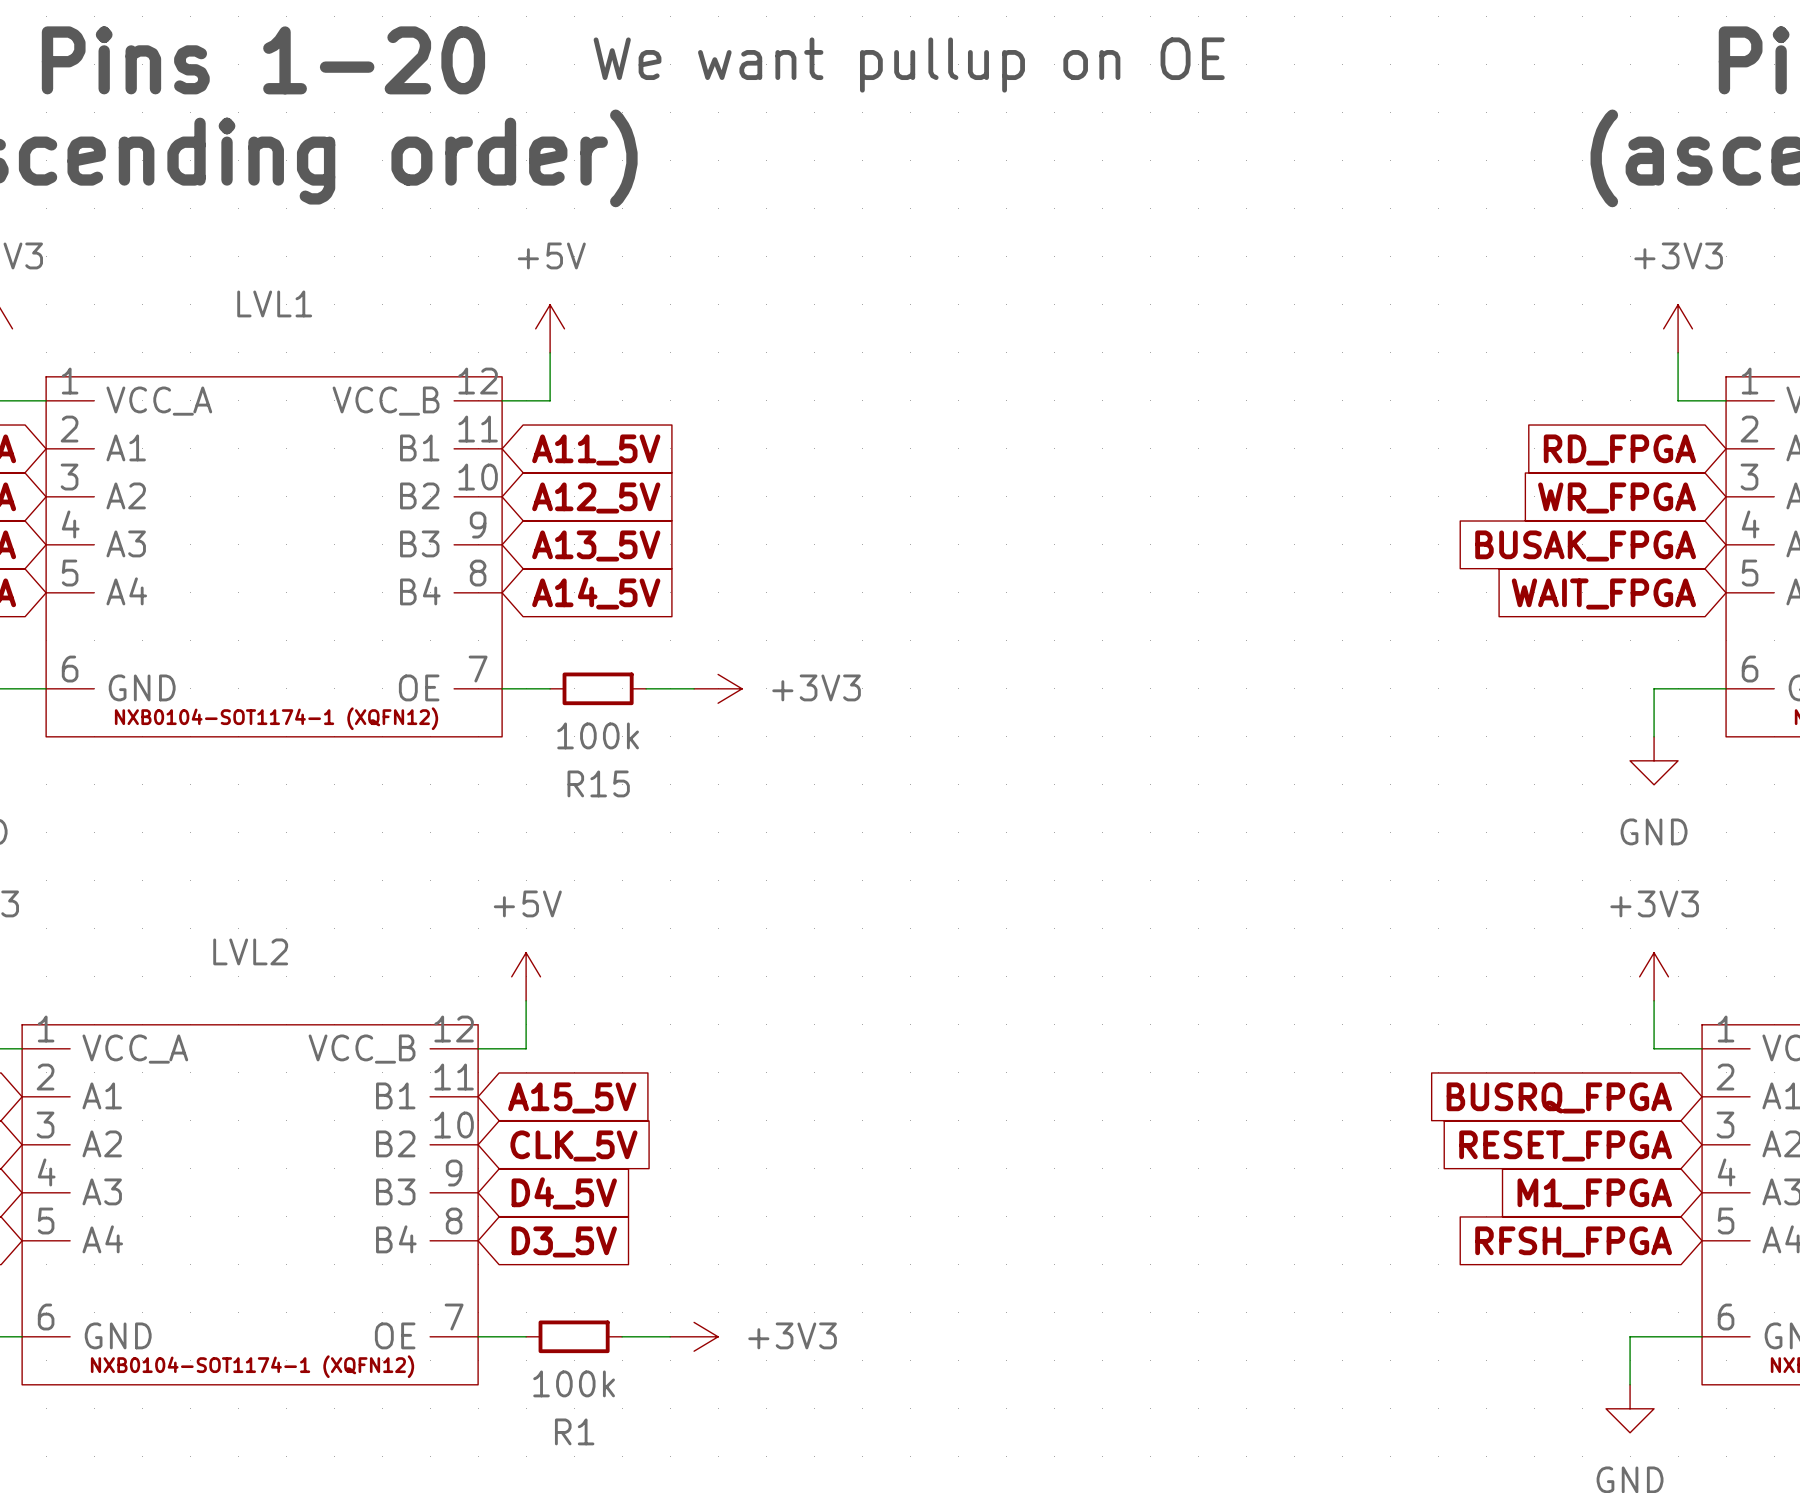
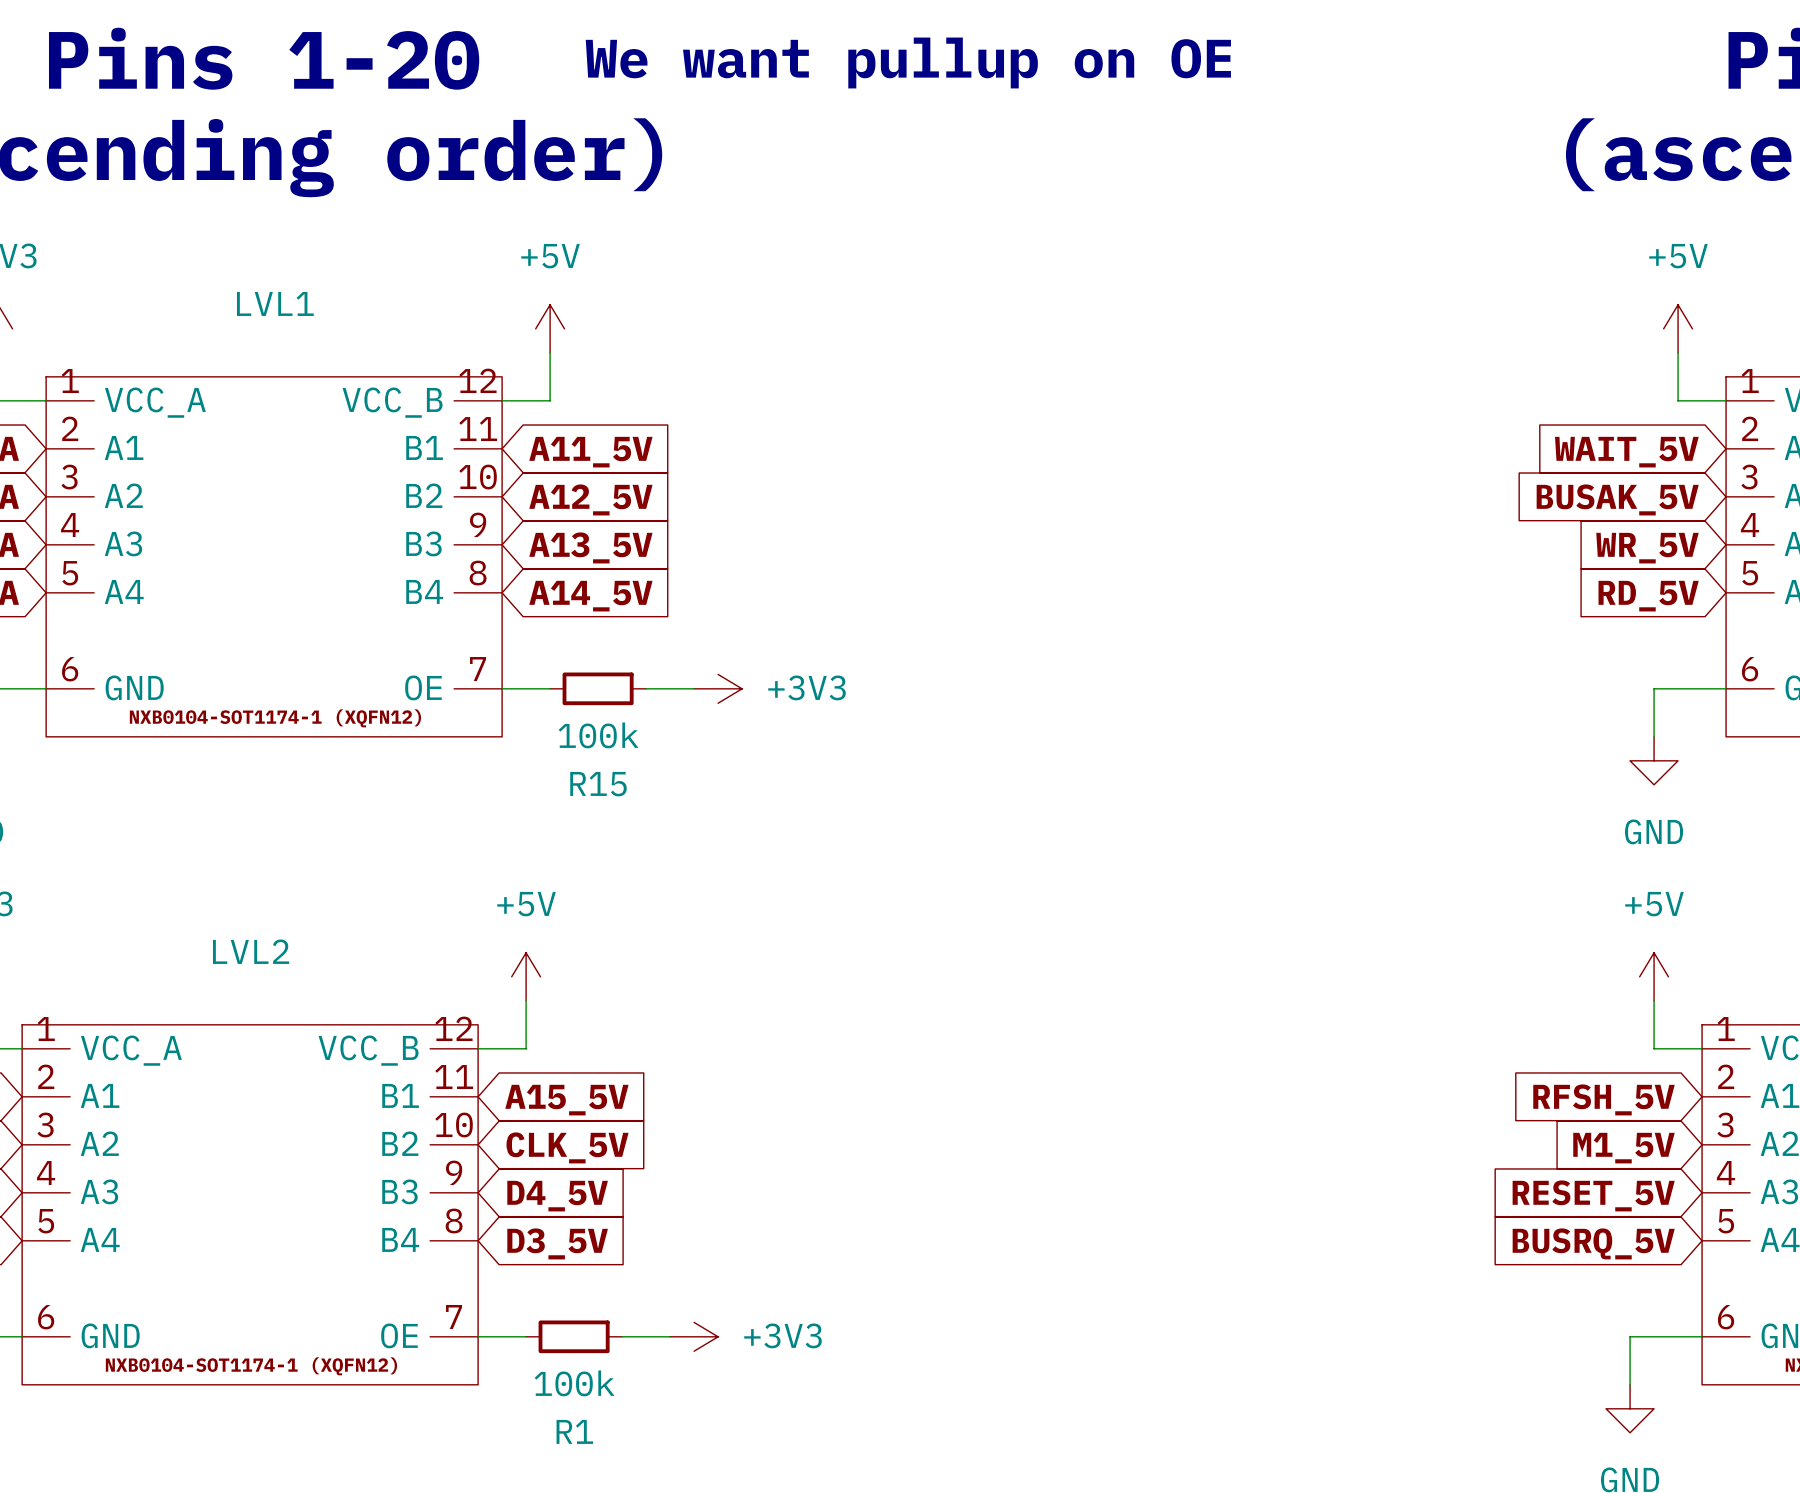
power symbol: +3V3 (1678, 328) -> +5V (1678, 328)
global label: RD_FPGA (1619, 449) -> WAIT_5V (1626, 452)
global label: WR_FPGA (1617, 497) -> BUSAK_5V (1617, 499)
global label: BUSAK_FPGA (1585, 545) -> WR_5V (1647, 548)
global label: WAIT_FPGA (1603, 593) -> RD_5V (1648, 596)
power symbol: +3V3 (1654, 976) -> +5V (1654, 976)
global label: BUSRQ_FPGA (1559, 1097) -> RFSH_5V (1603, 1099)
global label: RESET_FPGA (1565, 1145) -> M1_5V (1623, 1148)
global label: M1_FPGA (1594, 1193) -> RESET_5V (1593, 1195)
global label: RFSH_FPGA (1573, 1241) -> BUSRQ_5V (1593, 1243)

